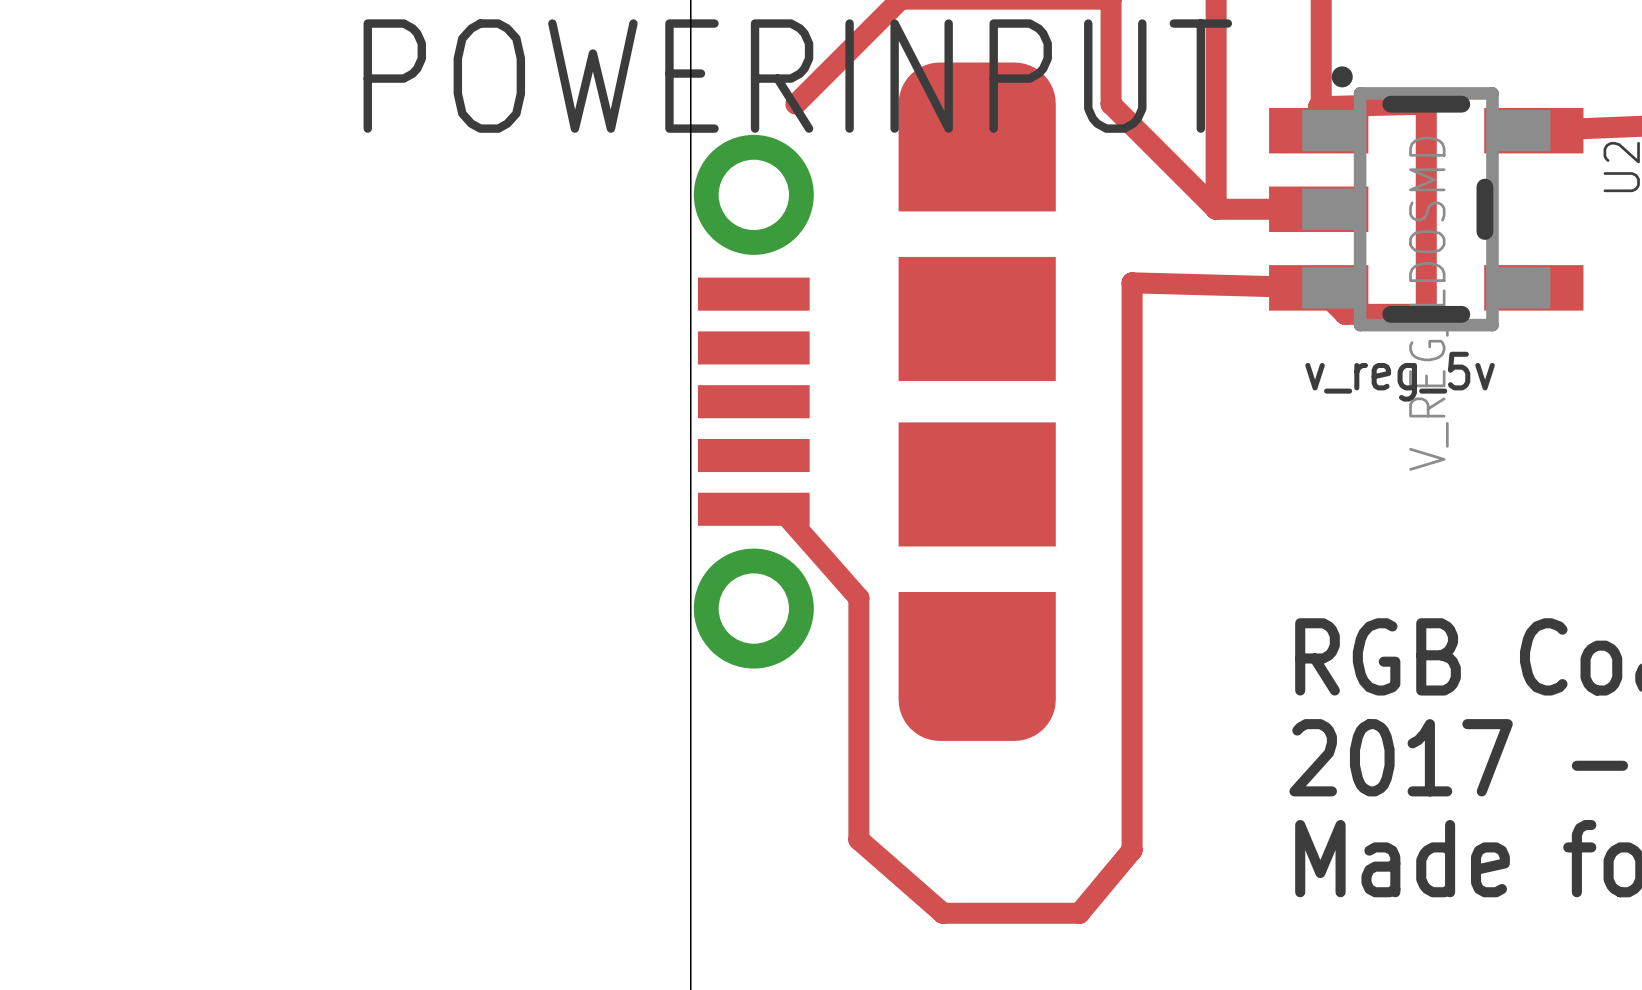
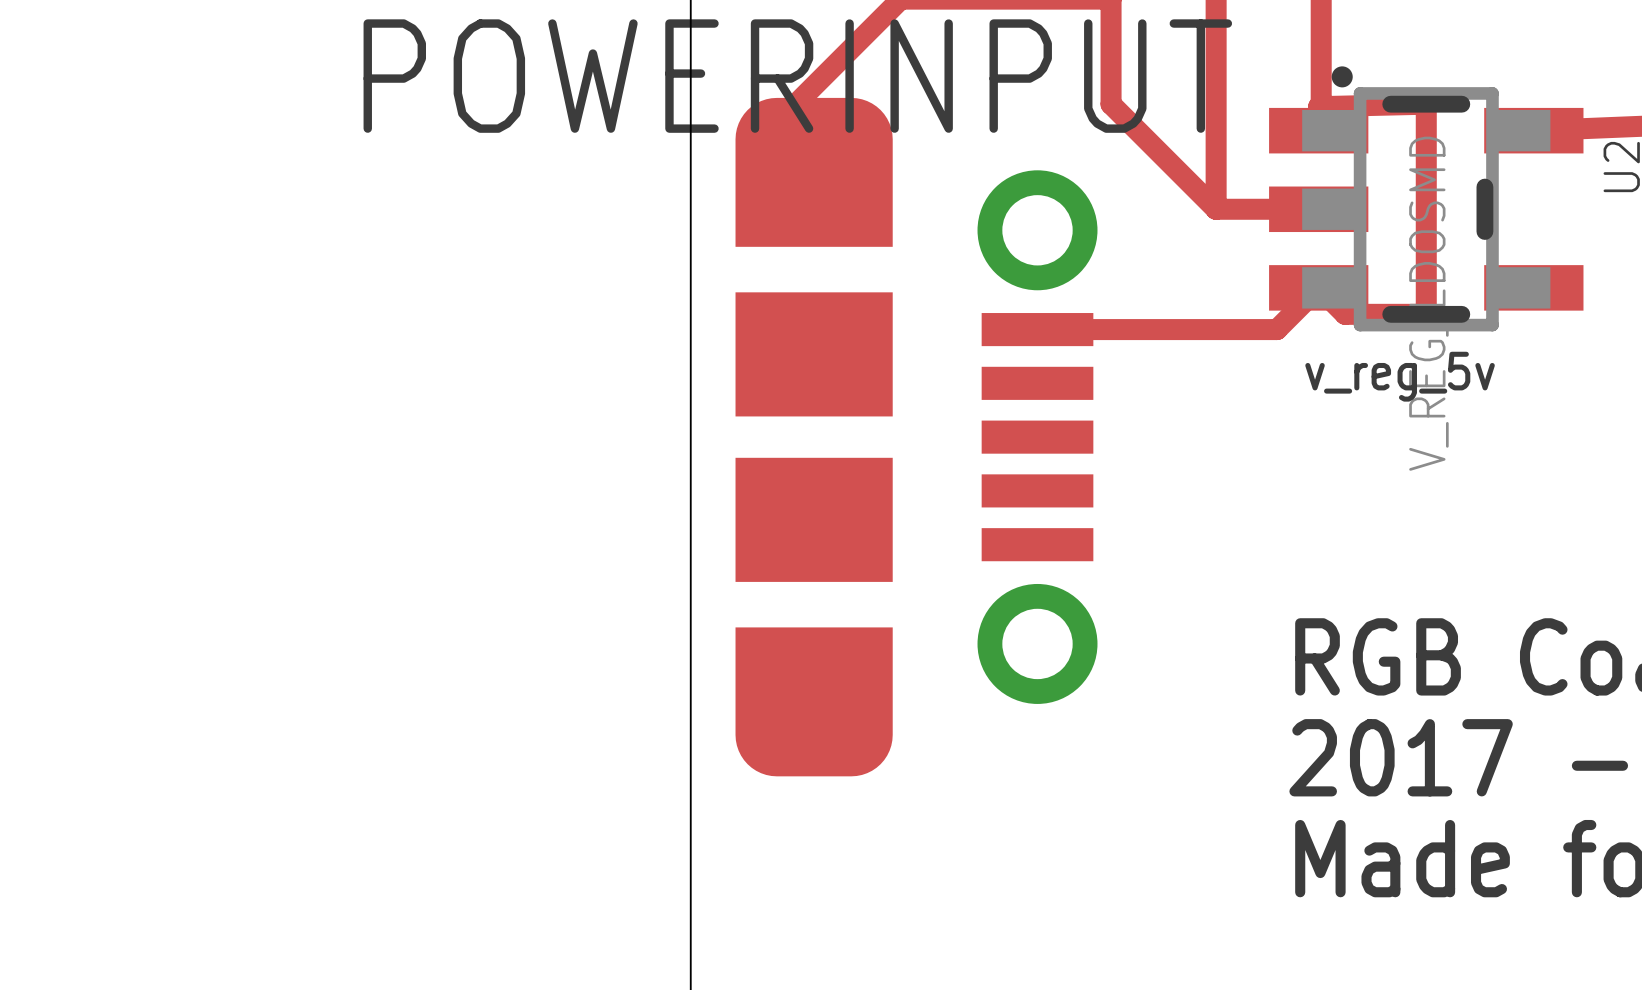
top track: (1318, 287) (1132, 282) (1132, 850) (1079, 913) (942, 913) (858, 839) (858, 598) (780, 509) (753, 509) -> (1318, 287) (1277, 329) (1037, 329)
part rotation: 0° (874, 401) -> 180° (916, 437)

